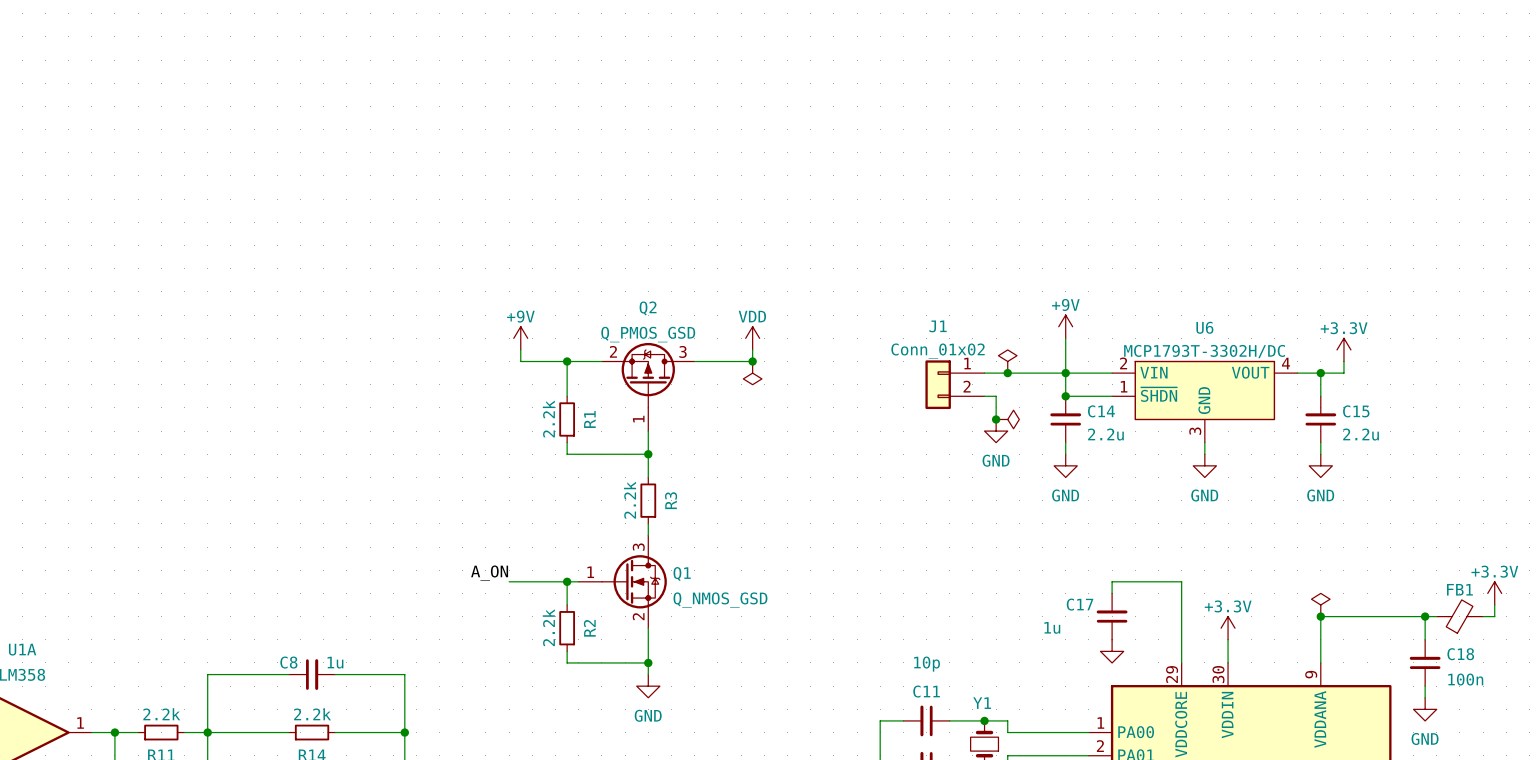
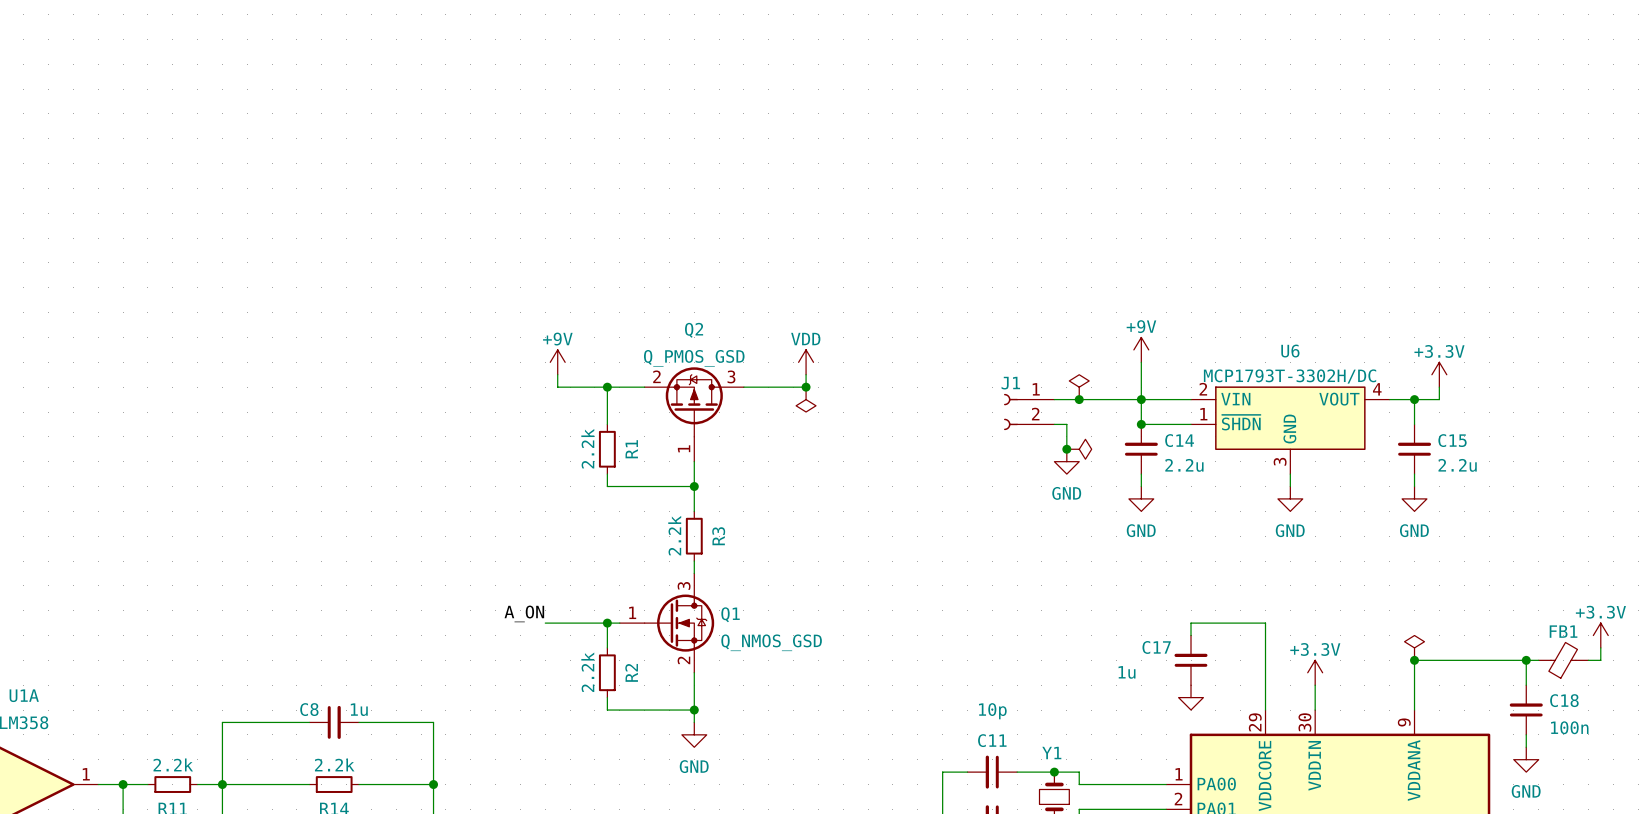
J1 name position: J1 (938, 326) -> J1 (1010, 383)
J1 value: Conn_01x02 (938, 351) -> none
J1 symbol: [925, 360, 985, 410] -> [1003, 393, 1055, 431]

